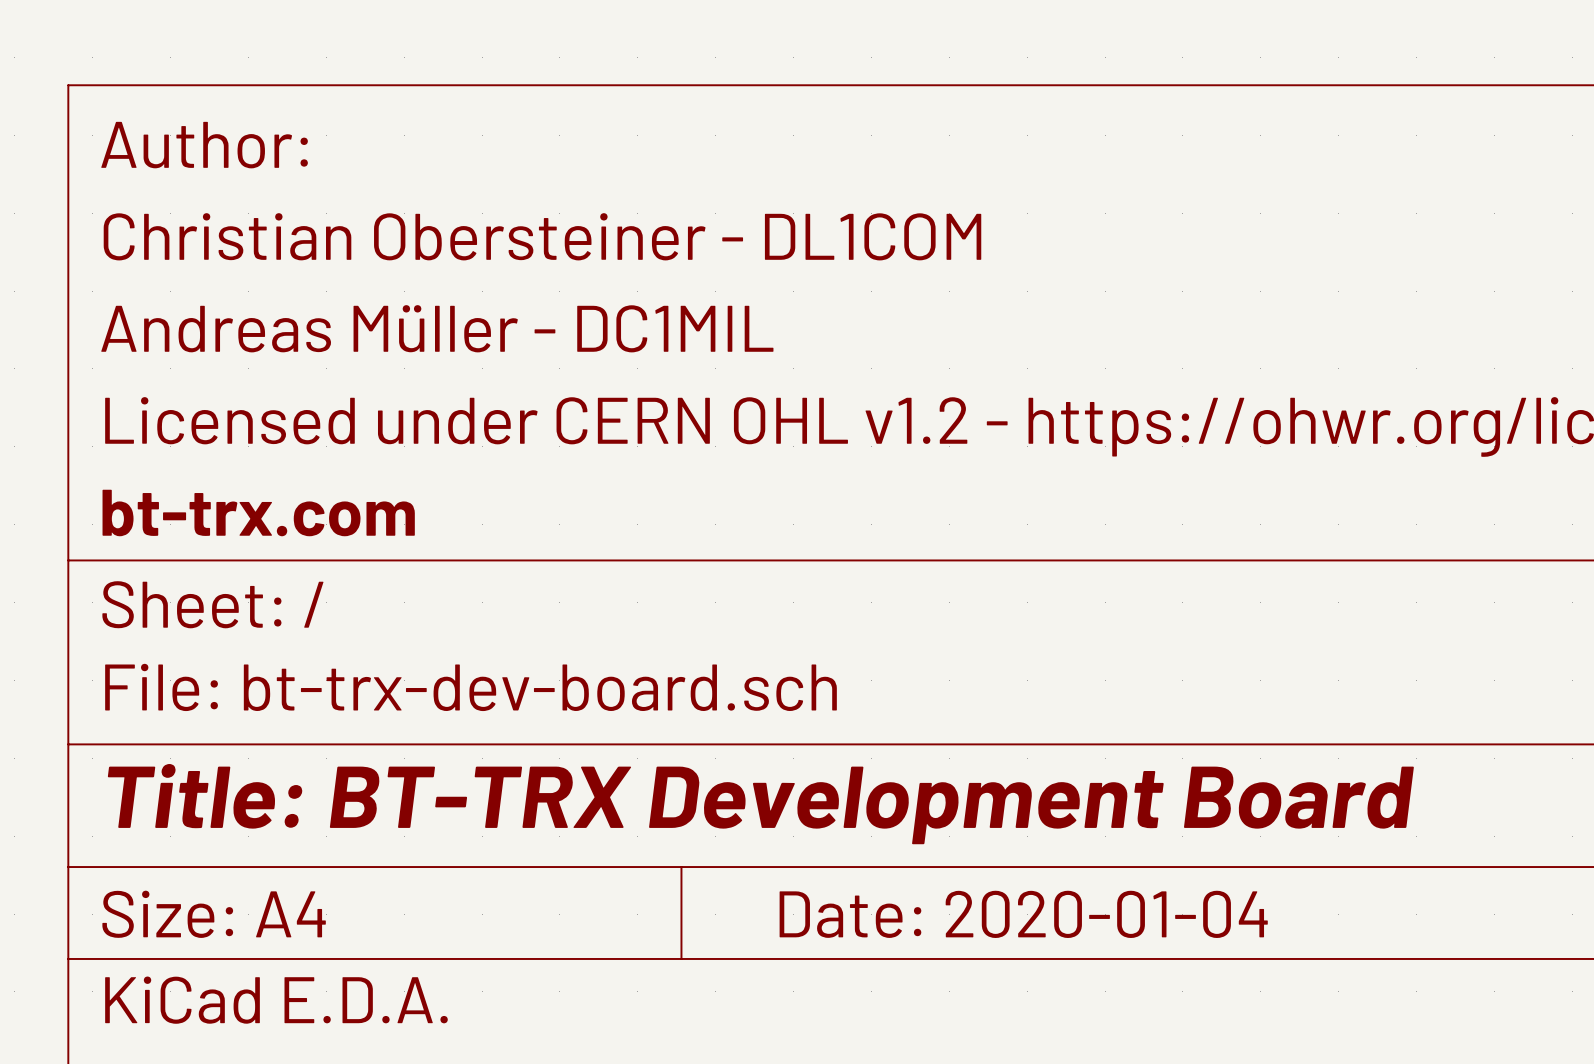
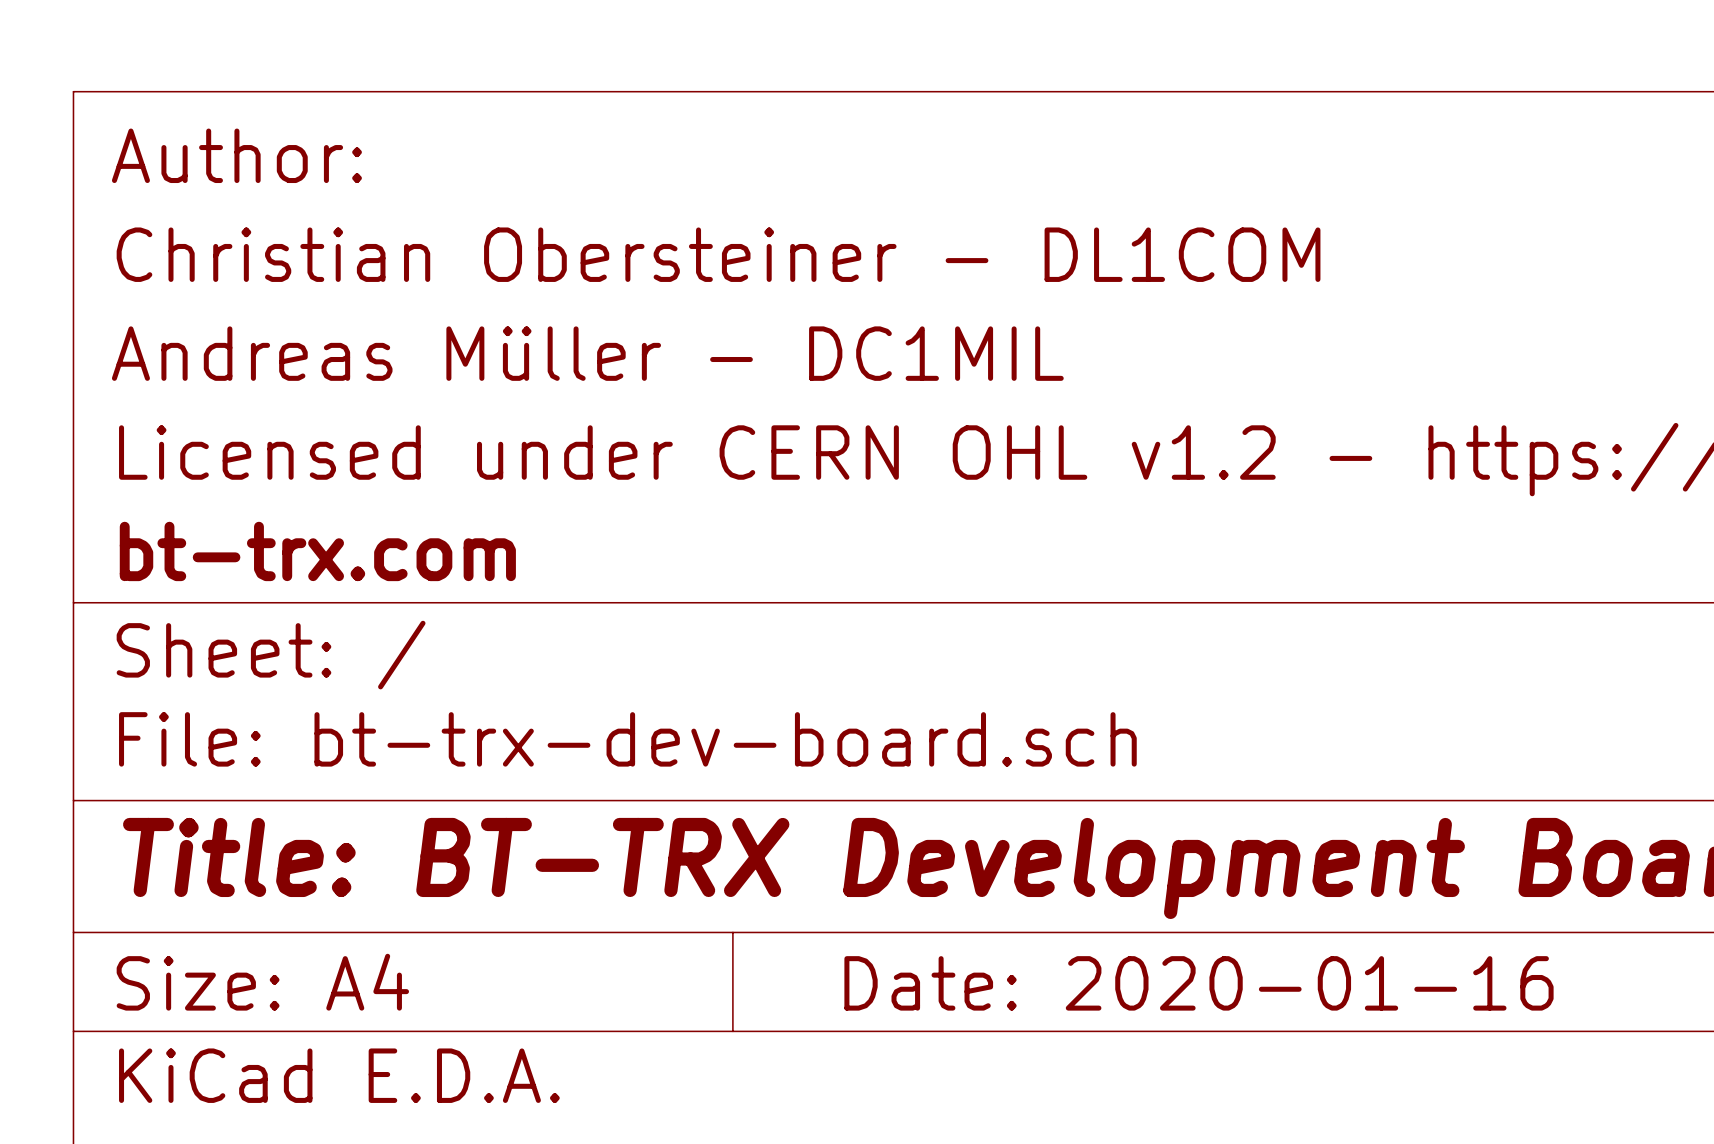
title block: Date: 2020-01-04 (1023, 914) -> Date: 2020-01-16 (1198, 983)

